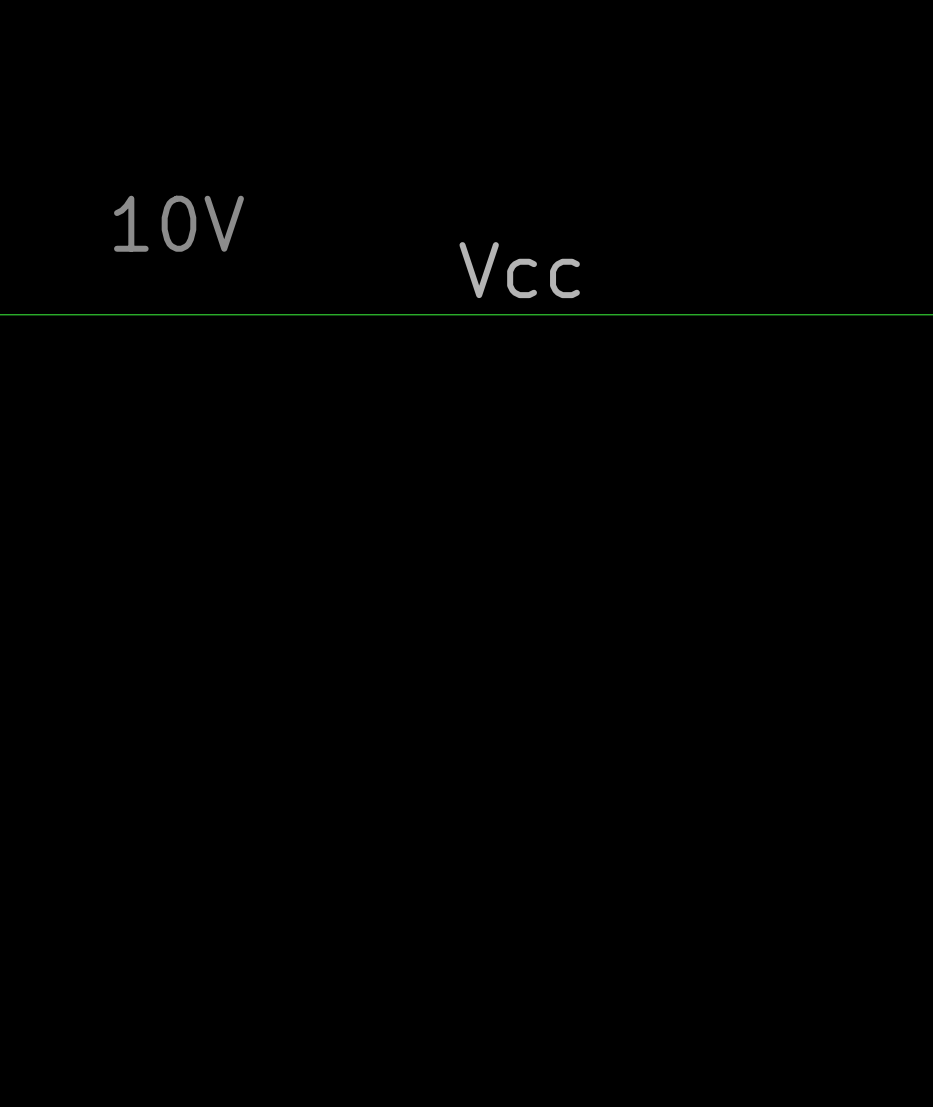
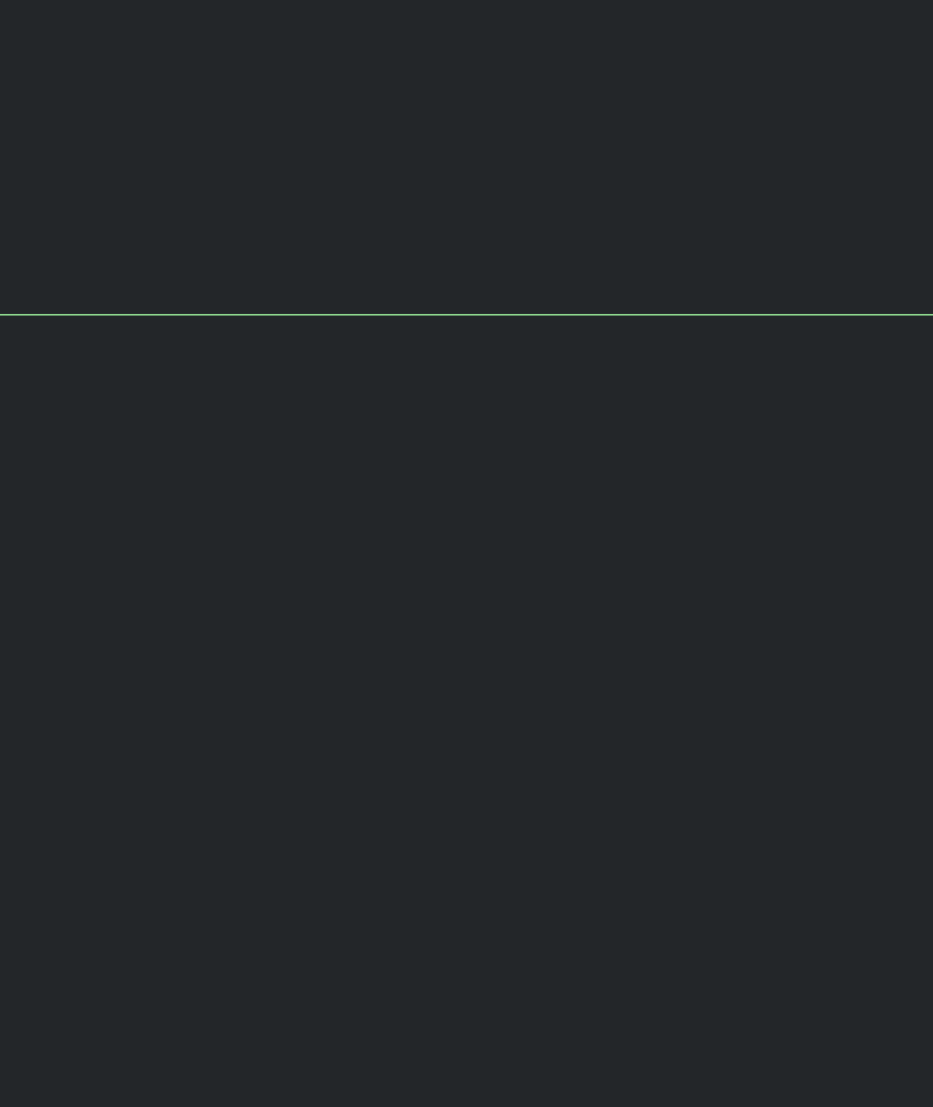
text: 10V (178, 223) -> none
label: Vcc (519, 270) -> none

